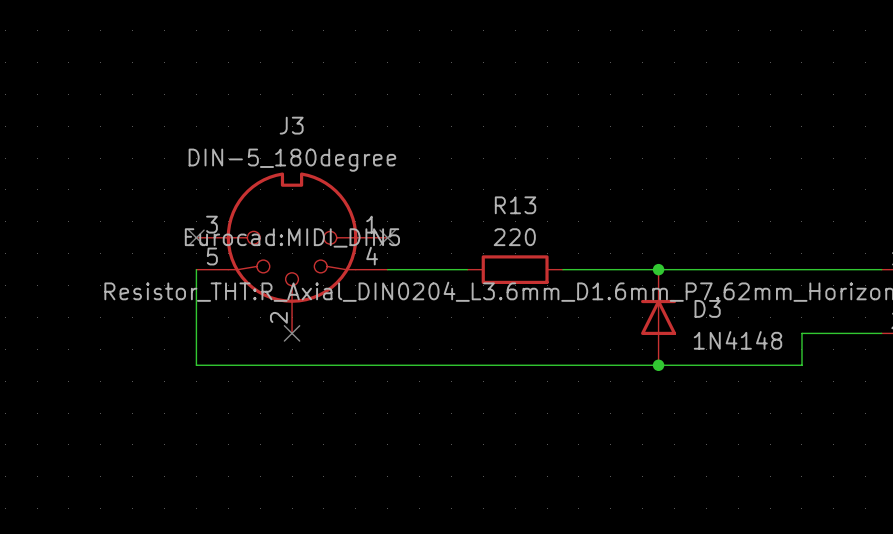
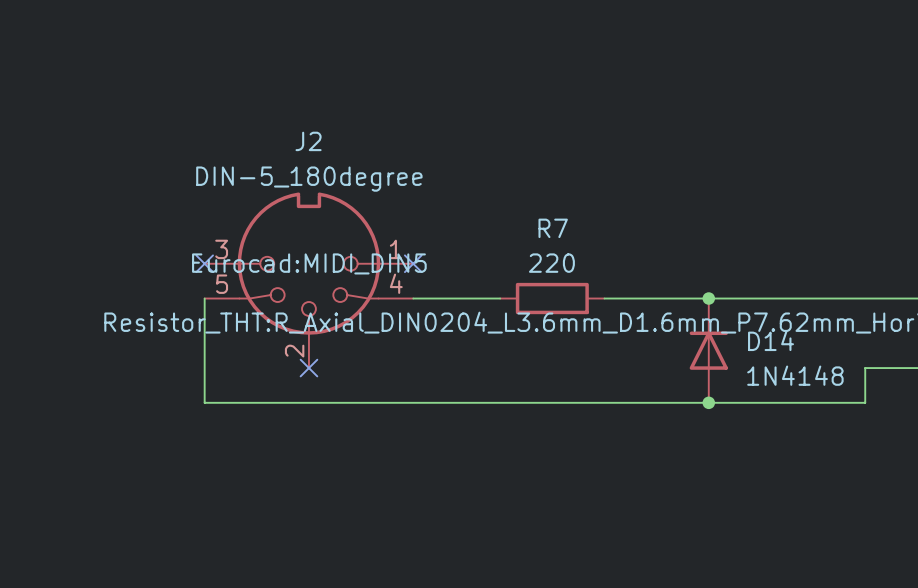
J3 name: J3 (291, 125) -> J2 (308, 141)
R13 name: R13 (515, 205) -> R7 (553, 228)
D3 name: D3 (707, 308) -> D14 (771, 340)

